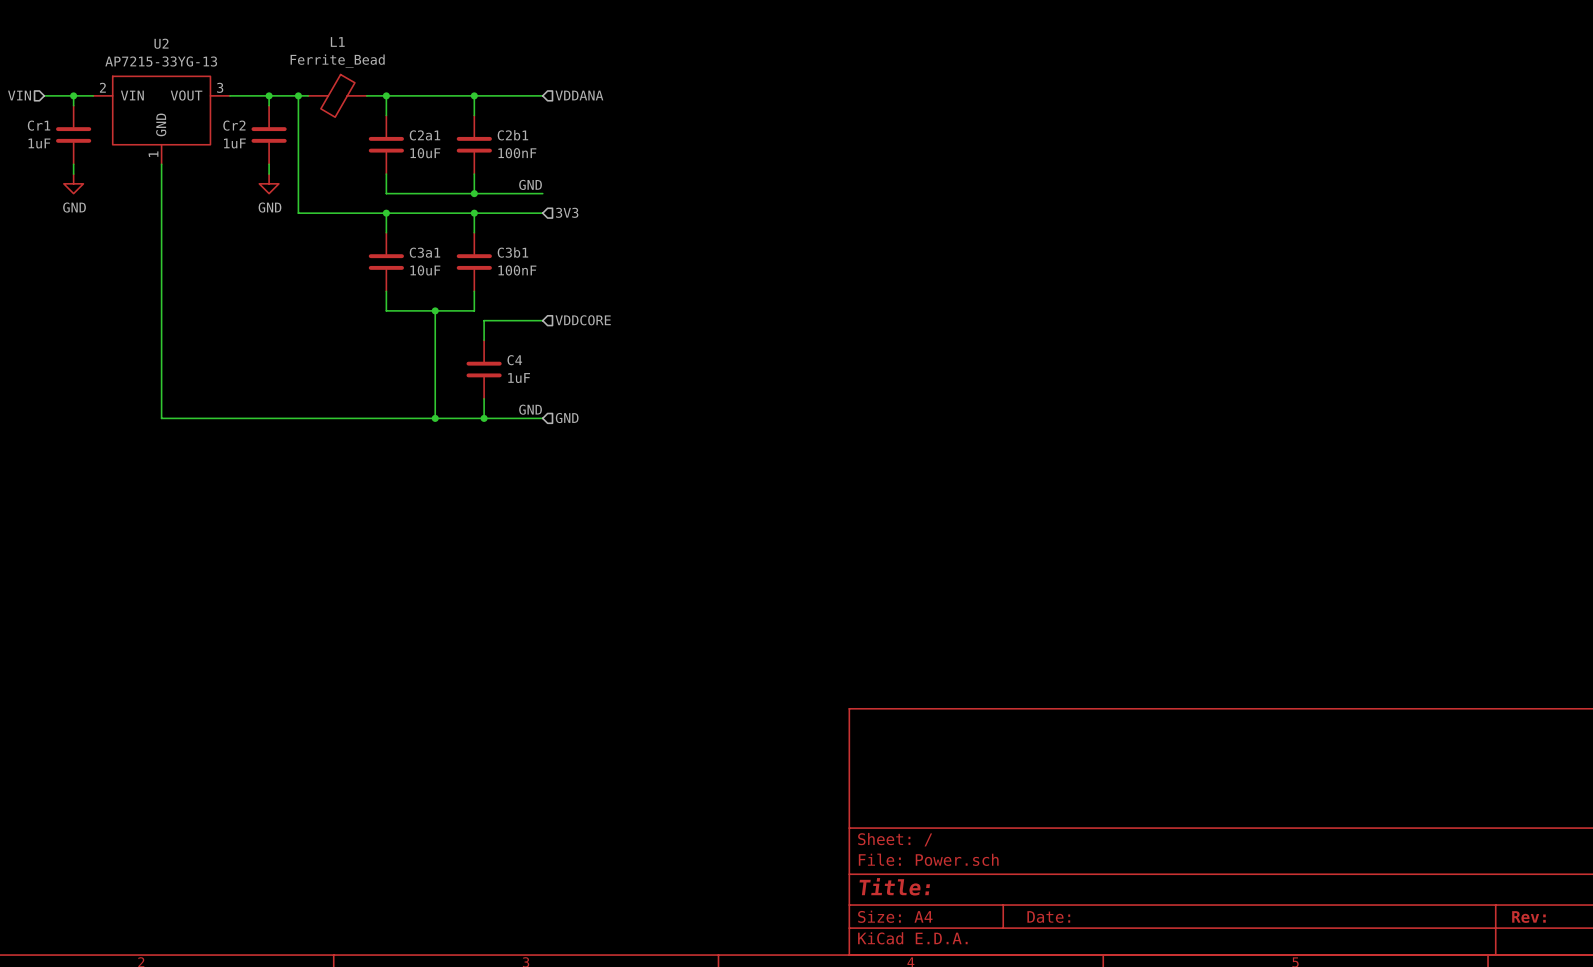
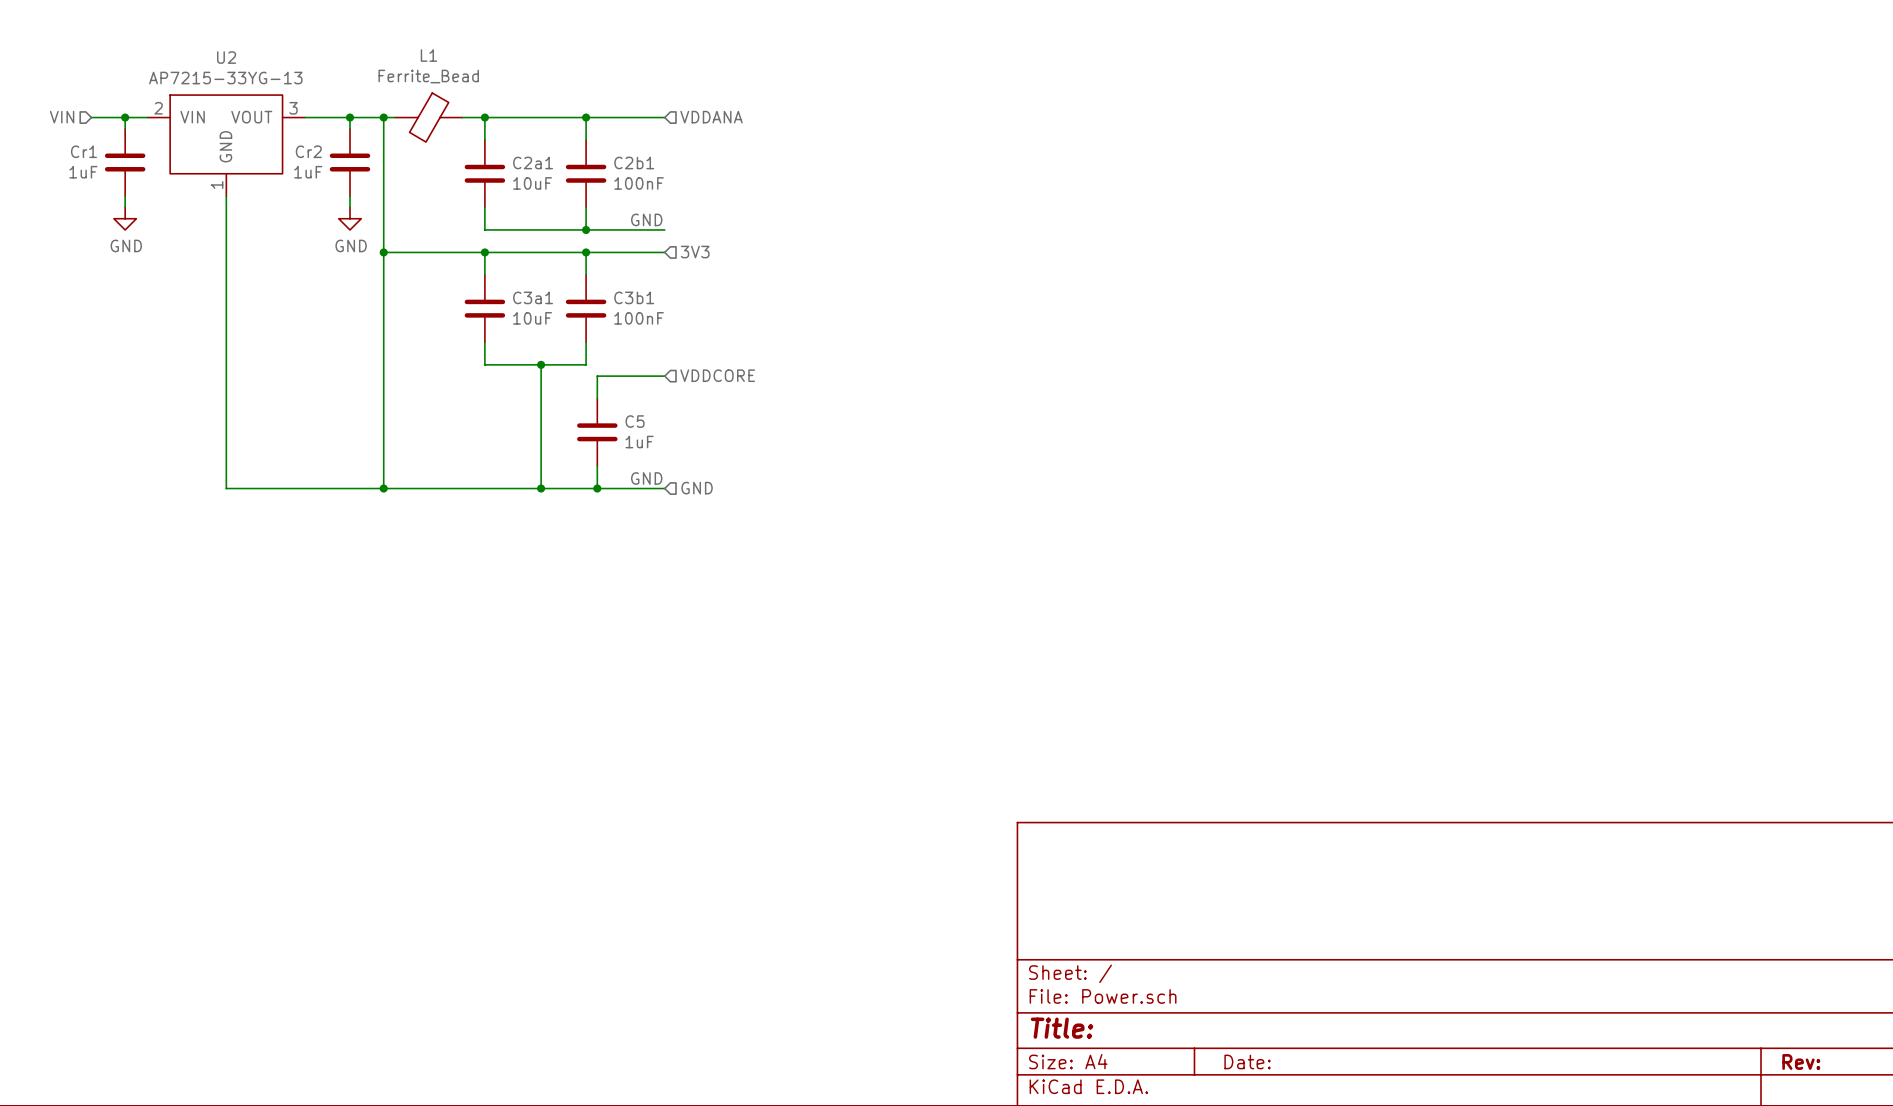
wire: none -> (383, 252) (383, 488)
junction: none -> (383, 252)
C4 name: C4 (514, 360) -> C5 (635, 421)
junction: none -> (383, 488)

